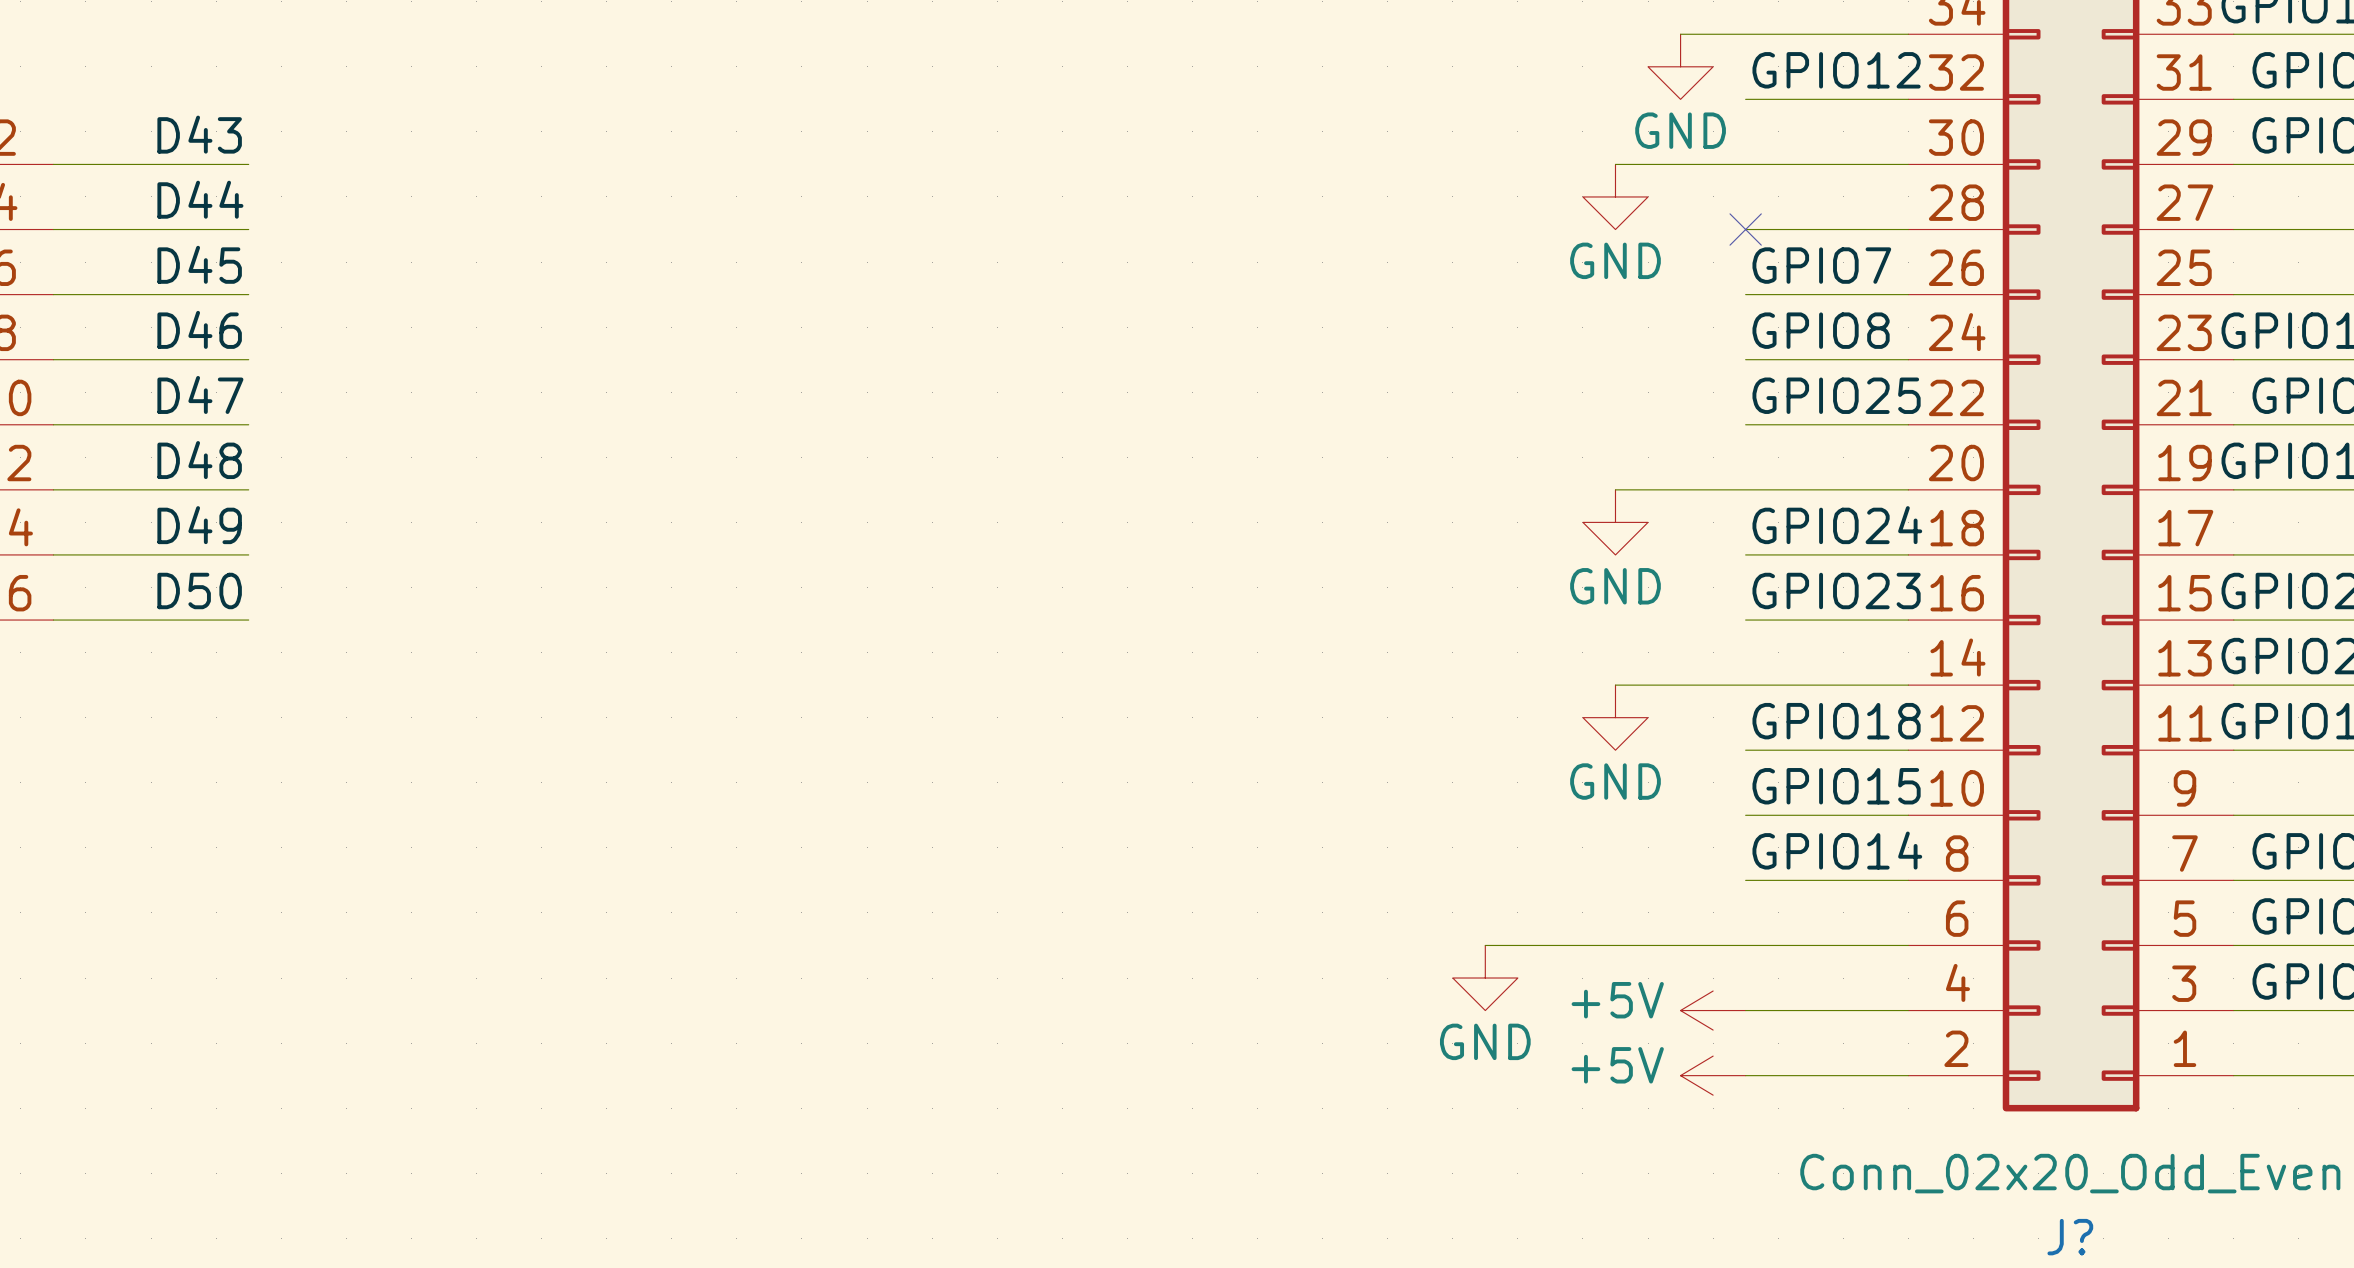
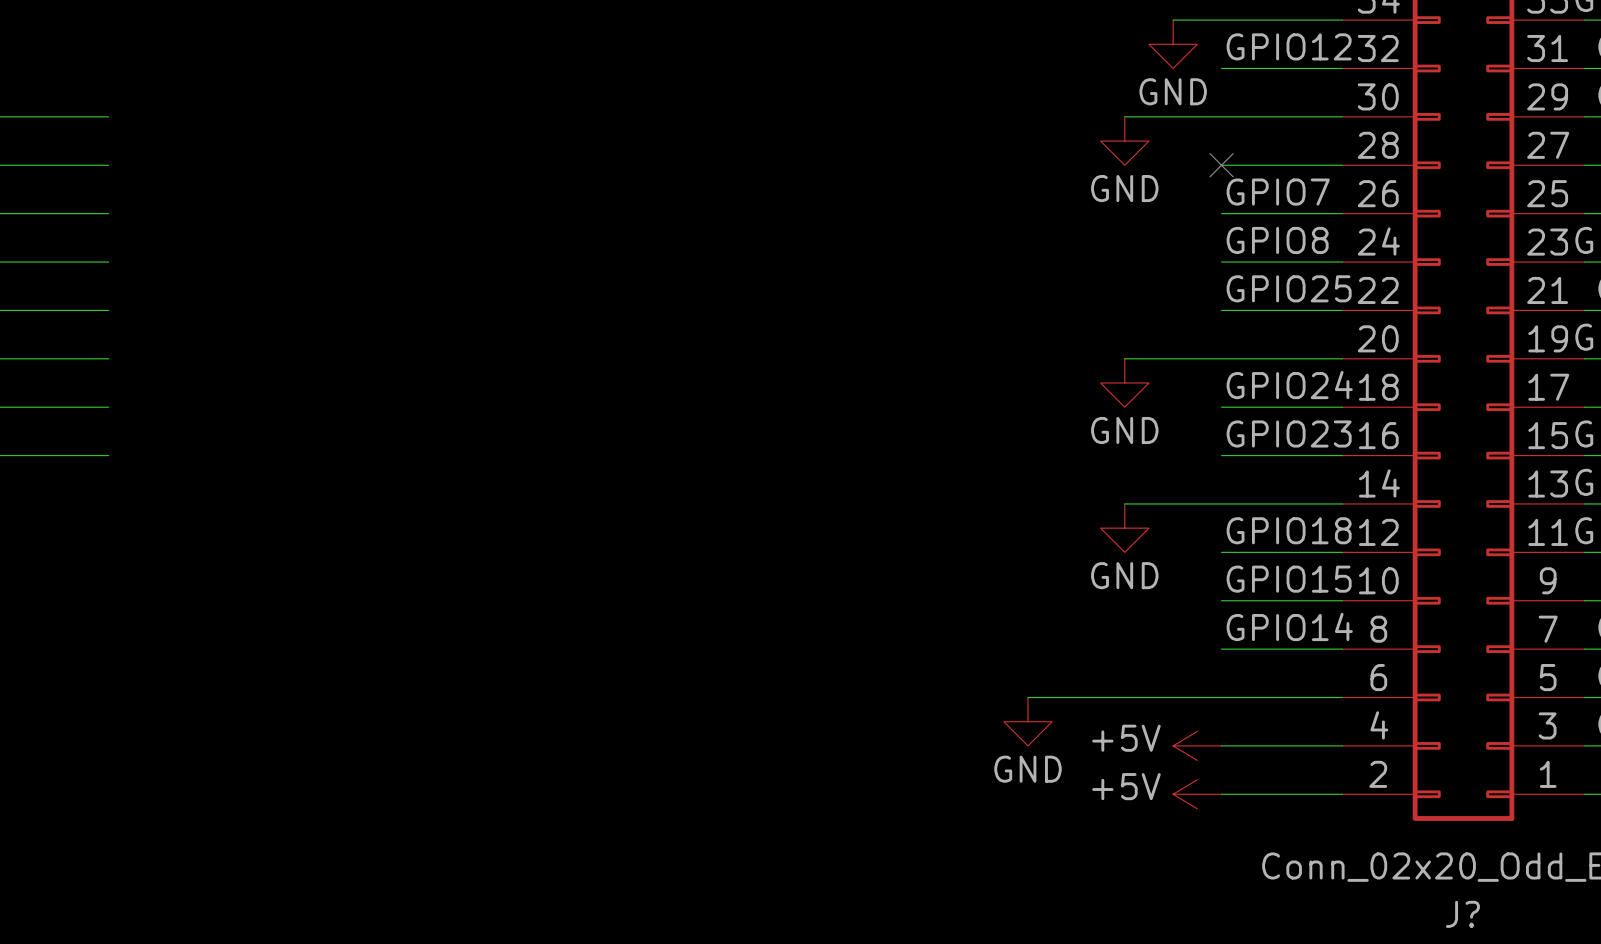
label: D43 (199, 134) -> none
label: D44 (200, 199) -> none
label: D45 (199, 264) -> none
label: D46 (199, 329) -> none
label: D47 (200, 394) -> none
label: D48 (199, 460) -> none
label: D49 (199, 525) -> none
label: D50 (199, 590) -> none

